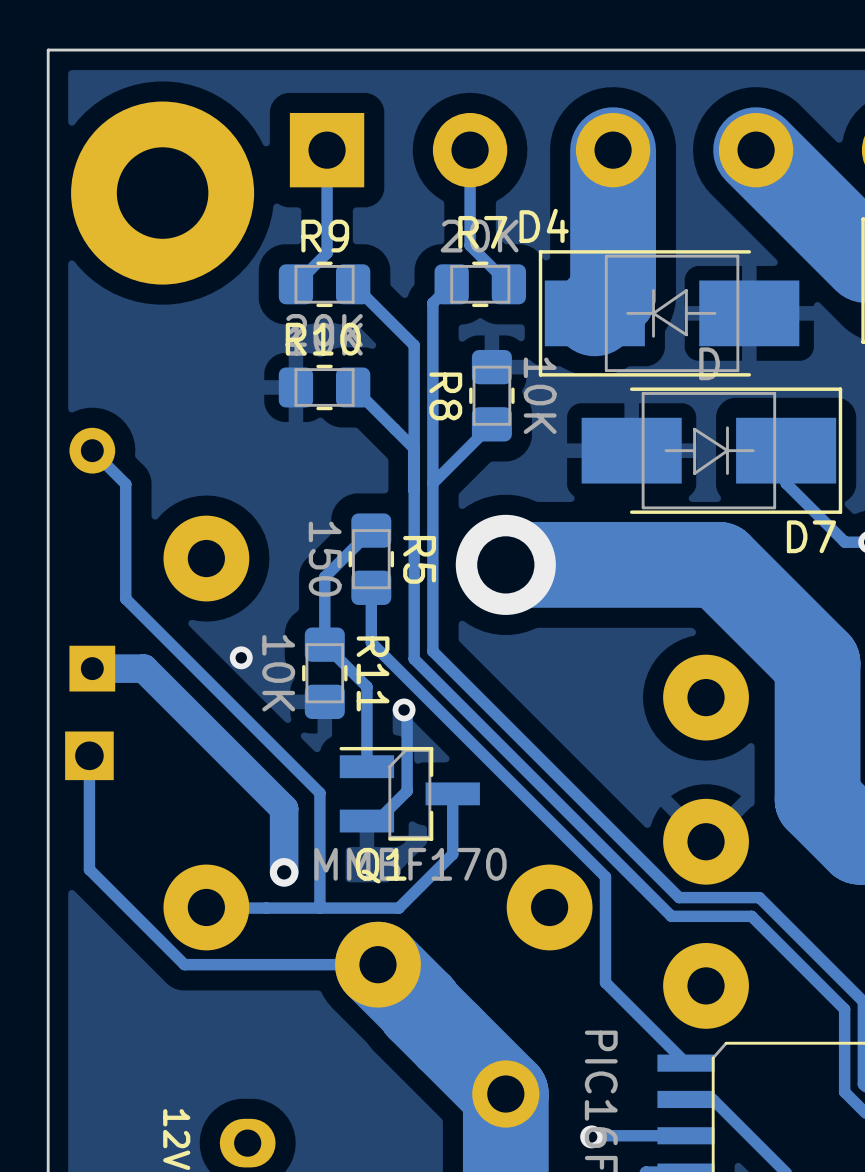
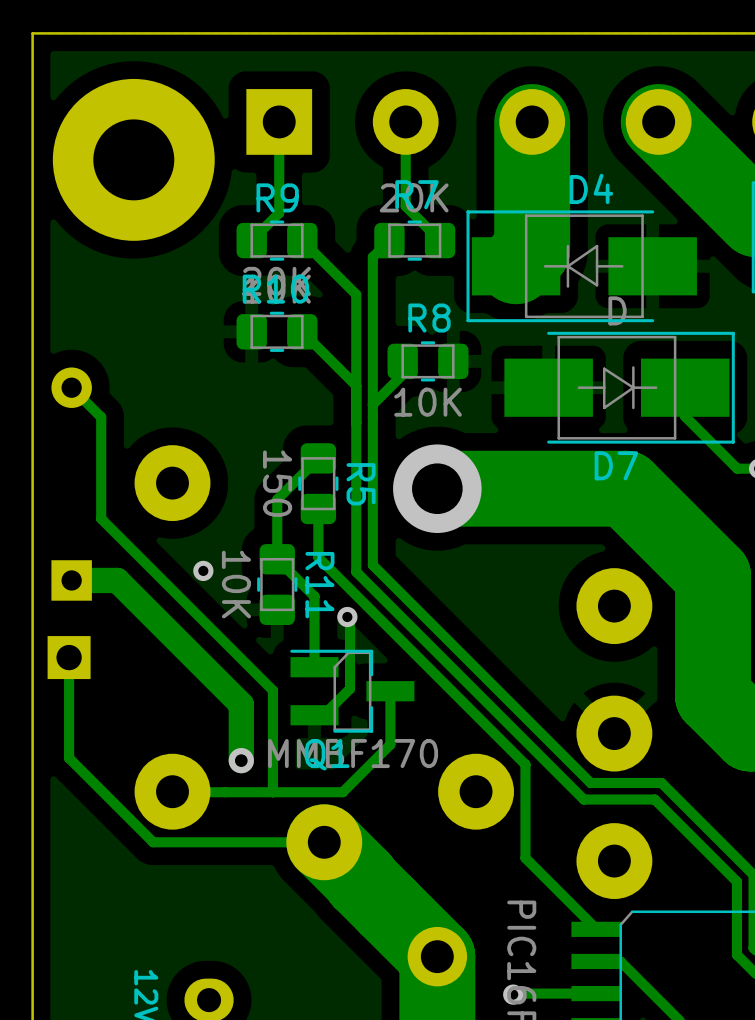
D4 name position: D4 (544, 225) -> D4 (591, 188)
R8 rotation: 0° (491, 395) -> 90° clockwise (428, 361)
track: none -> (402, 361) (402, 374) (372, 404)
track: (491, 424) (432, 483) -> none
D7 name position: D7 (811, 536) -> D7 (616, 465)

